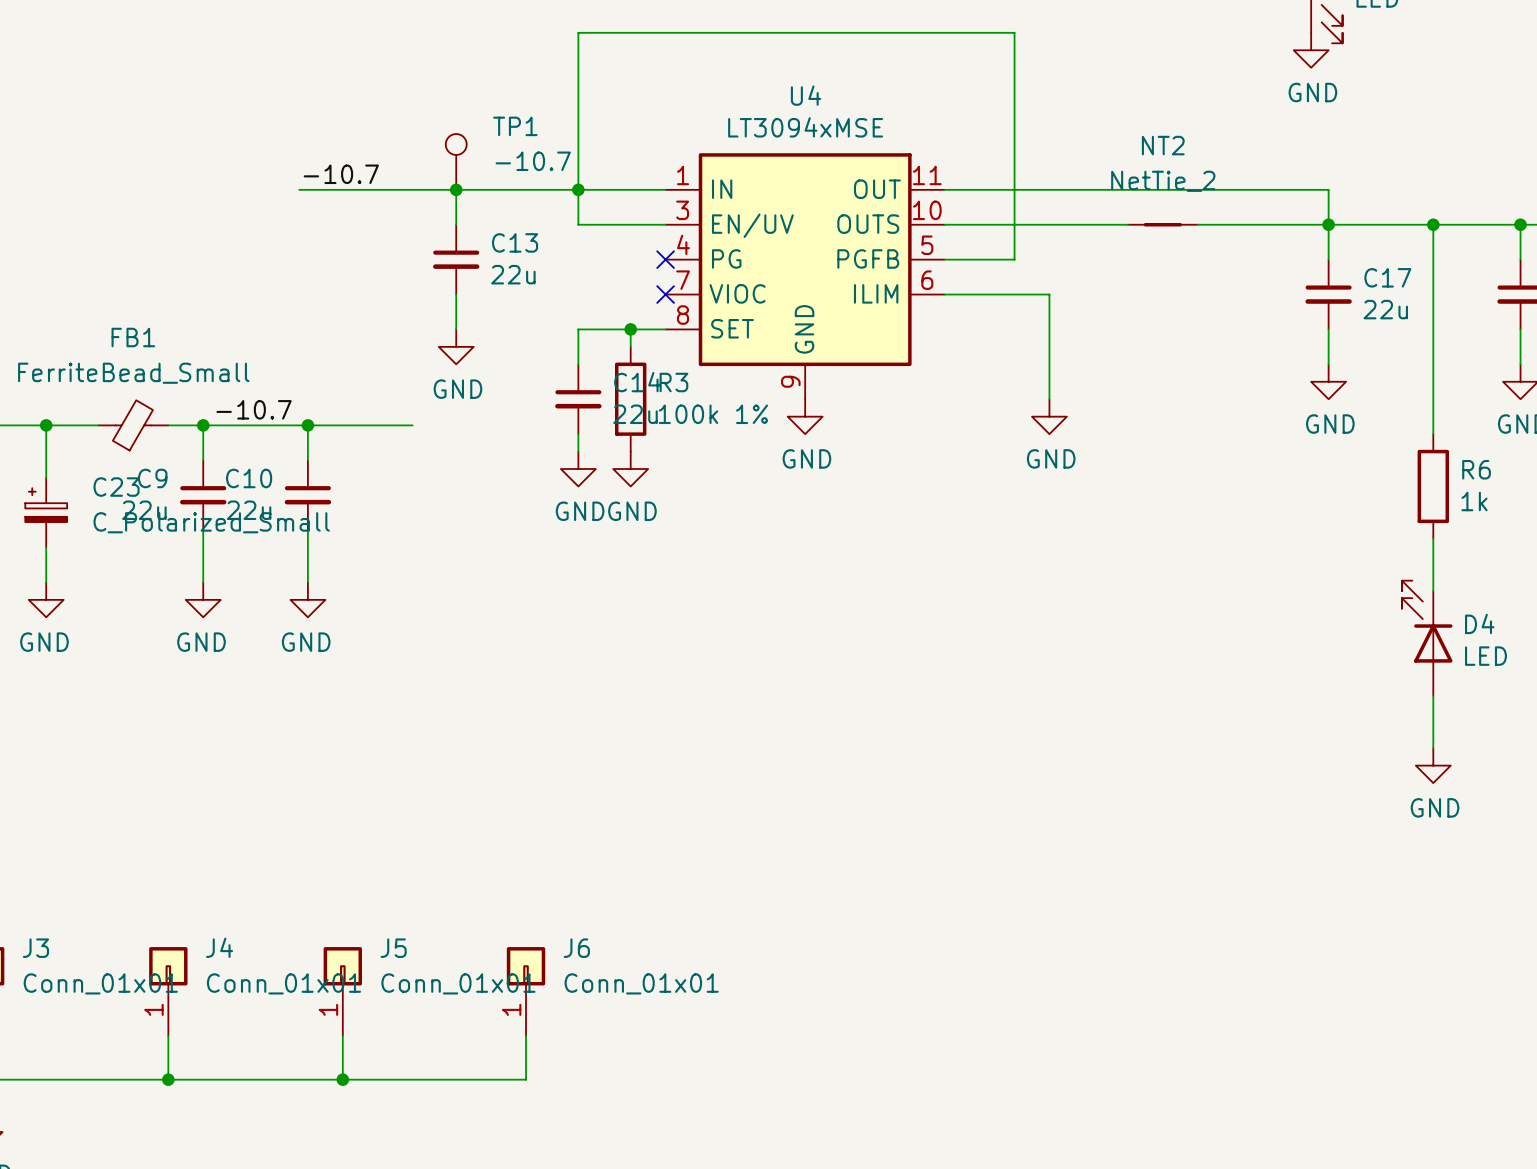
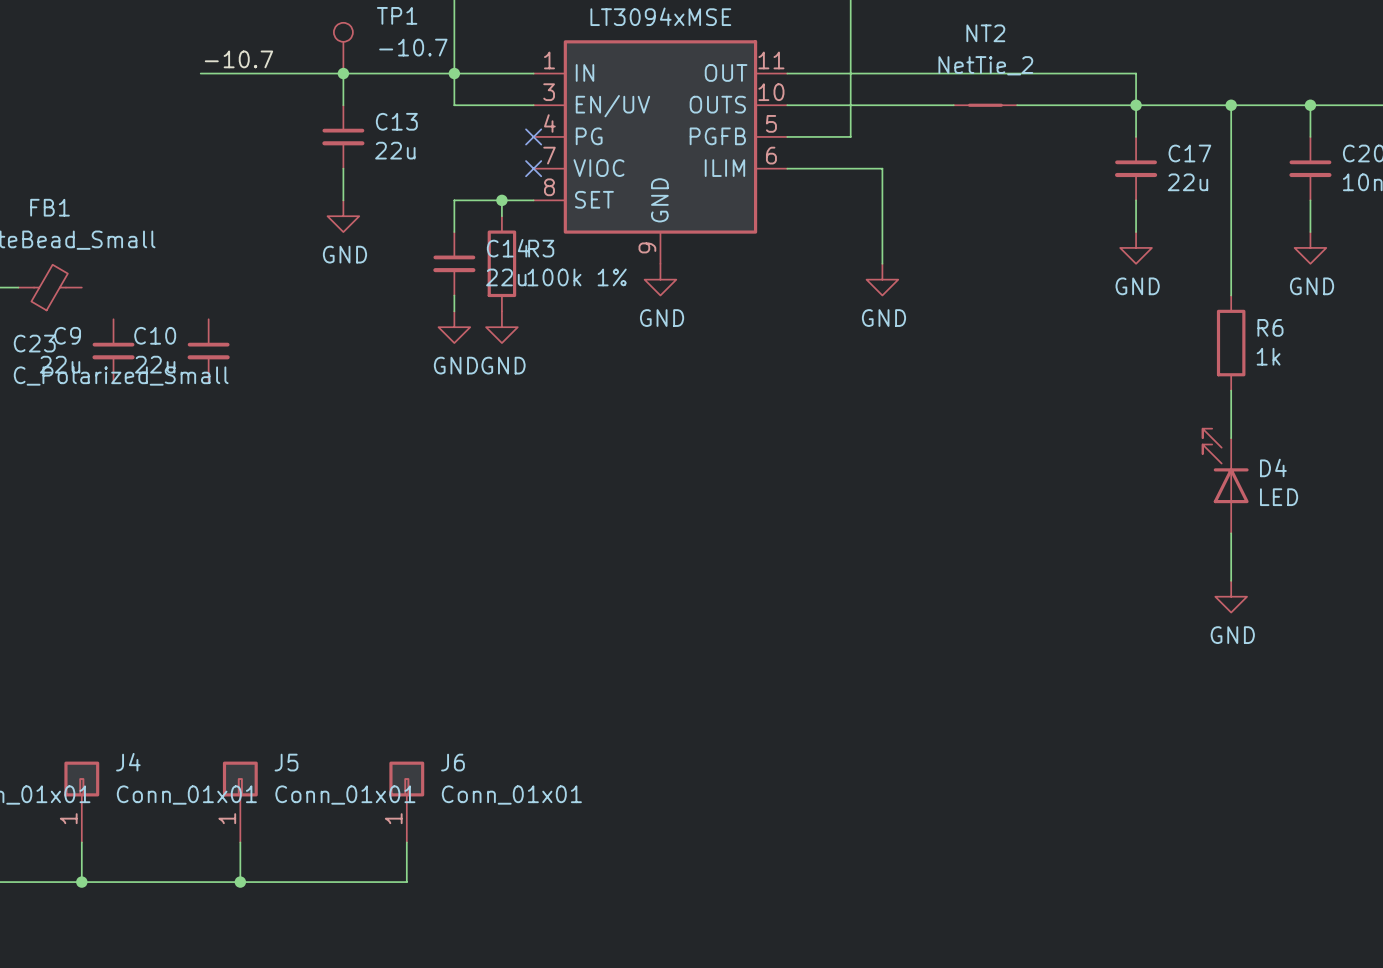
label: -10.7 (254, 409) -> none
wire: (168, 425) (412, 425) -> none
wire: (203, 425) (203, 460) -> none
junction: (203, 425) -> none
wire: (307, 425) (307, 460) -> none
junction: (307, 425) -> none
wire: (203, 530) (203, 582) -> none
wire: (307, 530) (307, 582) -> none
power symbol: GND (203, 599) -> none
power symbol: GND (307, 599) -> none

